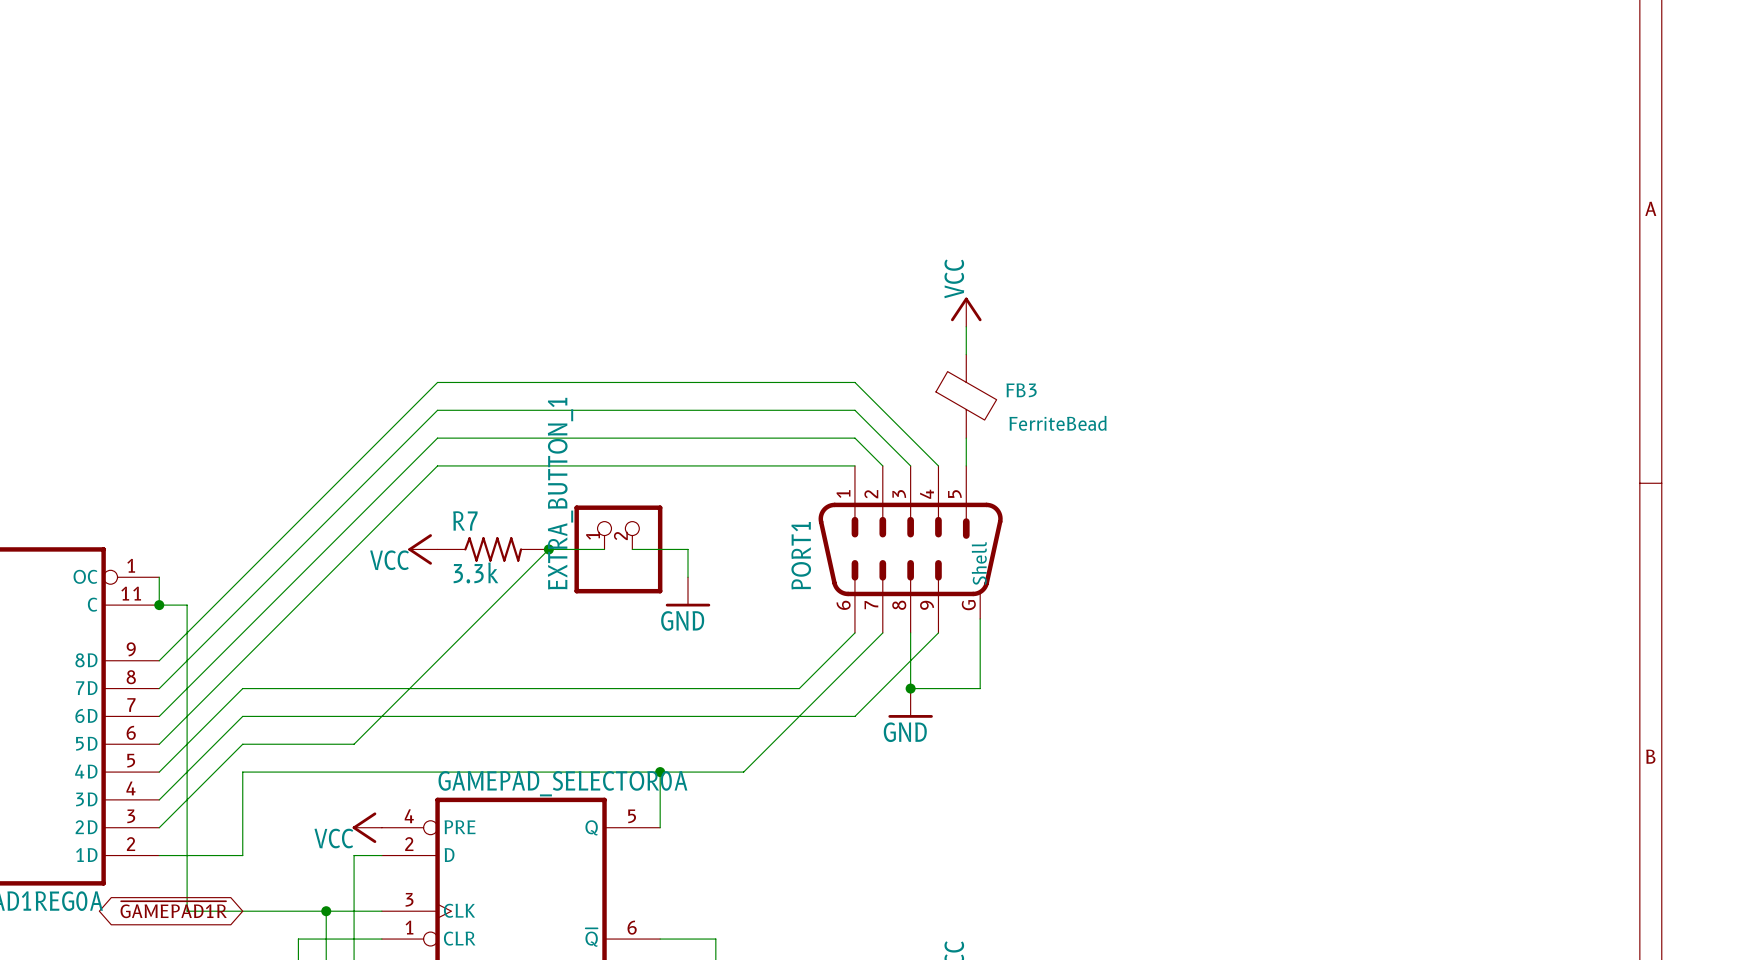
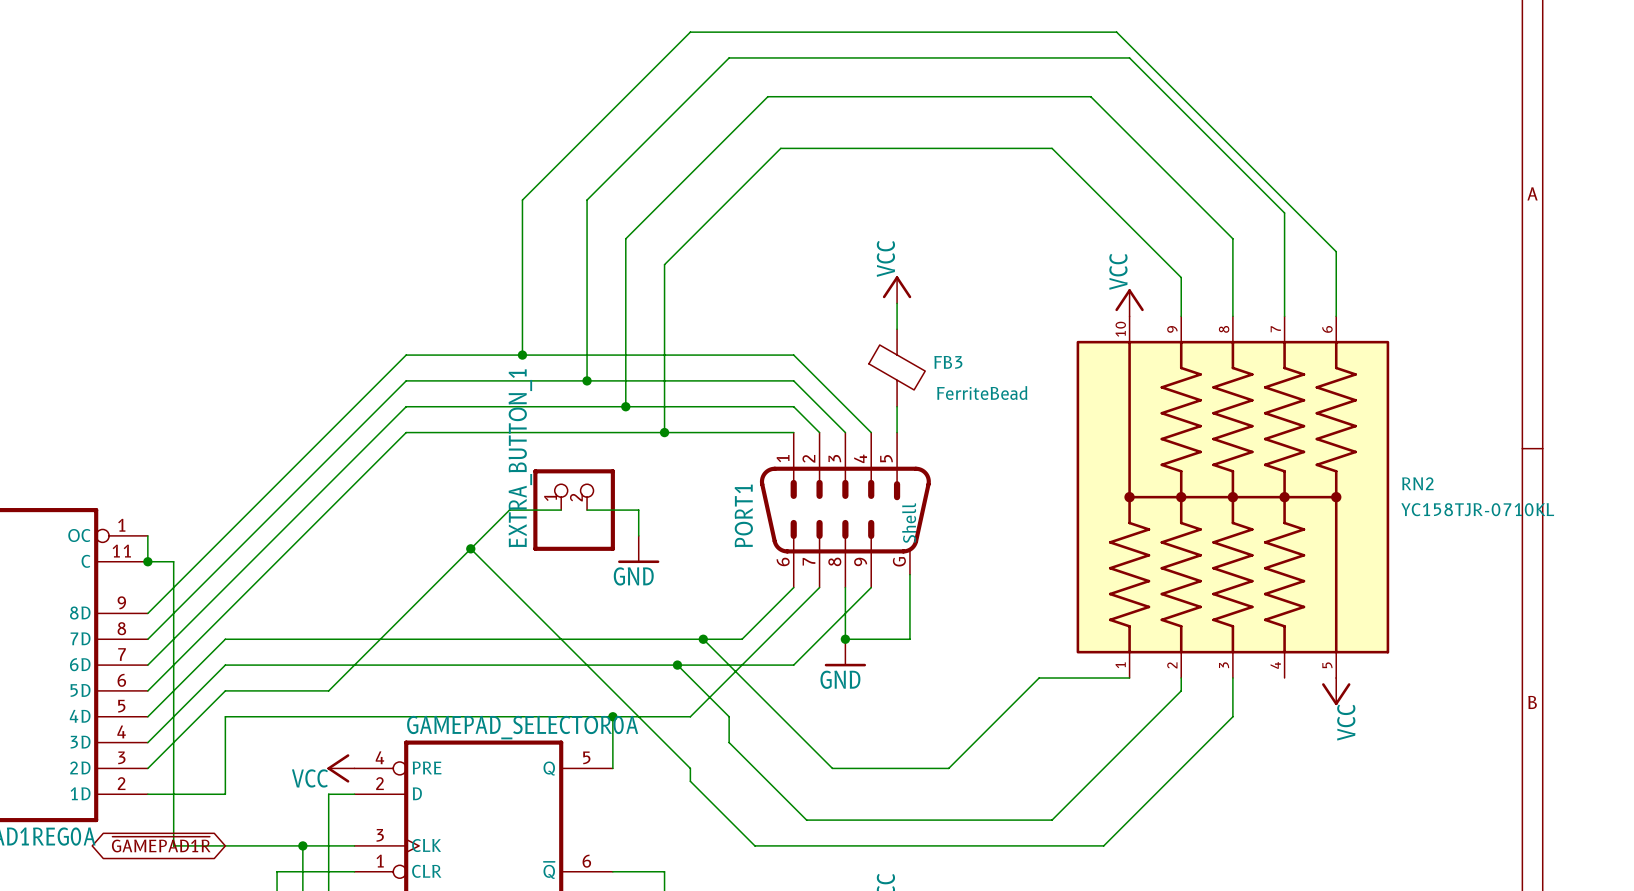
power symbol: none -> VCC (1129, 302)
wire: none -> (1181, 316) (1181, 277) (1052, 148) (780, 148) (664, 264) (664, 432)
wire: none -> (1232, 316) (1232, 238) (1090, 96) (767, 96) (625, 238) (625, 406)
wire: none -> (1284, 316) (1284, 212) (1129, 57) (729, 57) (587, 200) (587, 380)
wire: none -> (1336, 316) (1336, 251) (1116, 32) (690, 32) (522, 200) (522, 355)
junction: none -> (522, 355)
junction: none -> (587, 380)
junction: none -> (625, 406)
junction: none -> (664, 432)
RN2: none -> YC158TJR-0710KL (1232, 497)
power symbol: VCC (422, 549) -> none
R7: 3.3k (493, 549) -> none
junction position: (548, 549) -> (470, 548)
wire: none -> (470, 548) (690, 768) (690, 781) (754, 845) (1103, 845) (1232, 716) (1232, 678)
wire: none -> (703, 639) (832, 768) (948, 768) (1039, 678) (1129, 678)
junction: none -> (703, 639)
wire: none -> (677, 665) (729, 716) (729, 742) (806, 820) (1052, 820) (1181, 690) (1181, 678)
junction: none -> (677, 665)
power symbol: none -> VCC (1336, 691)

